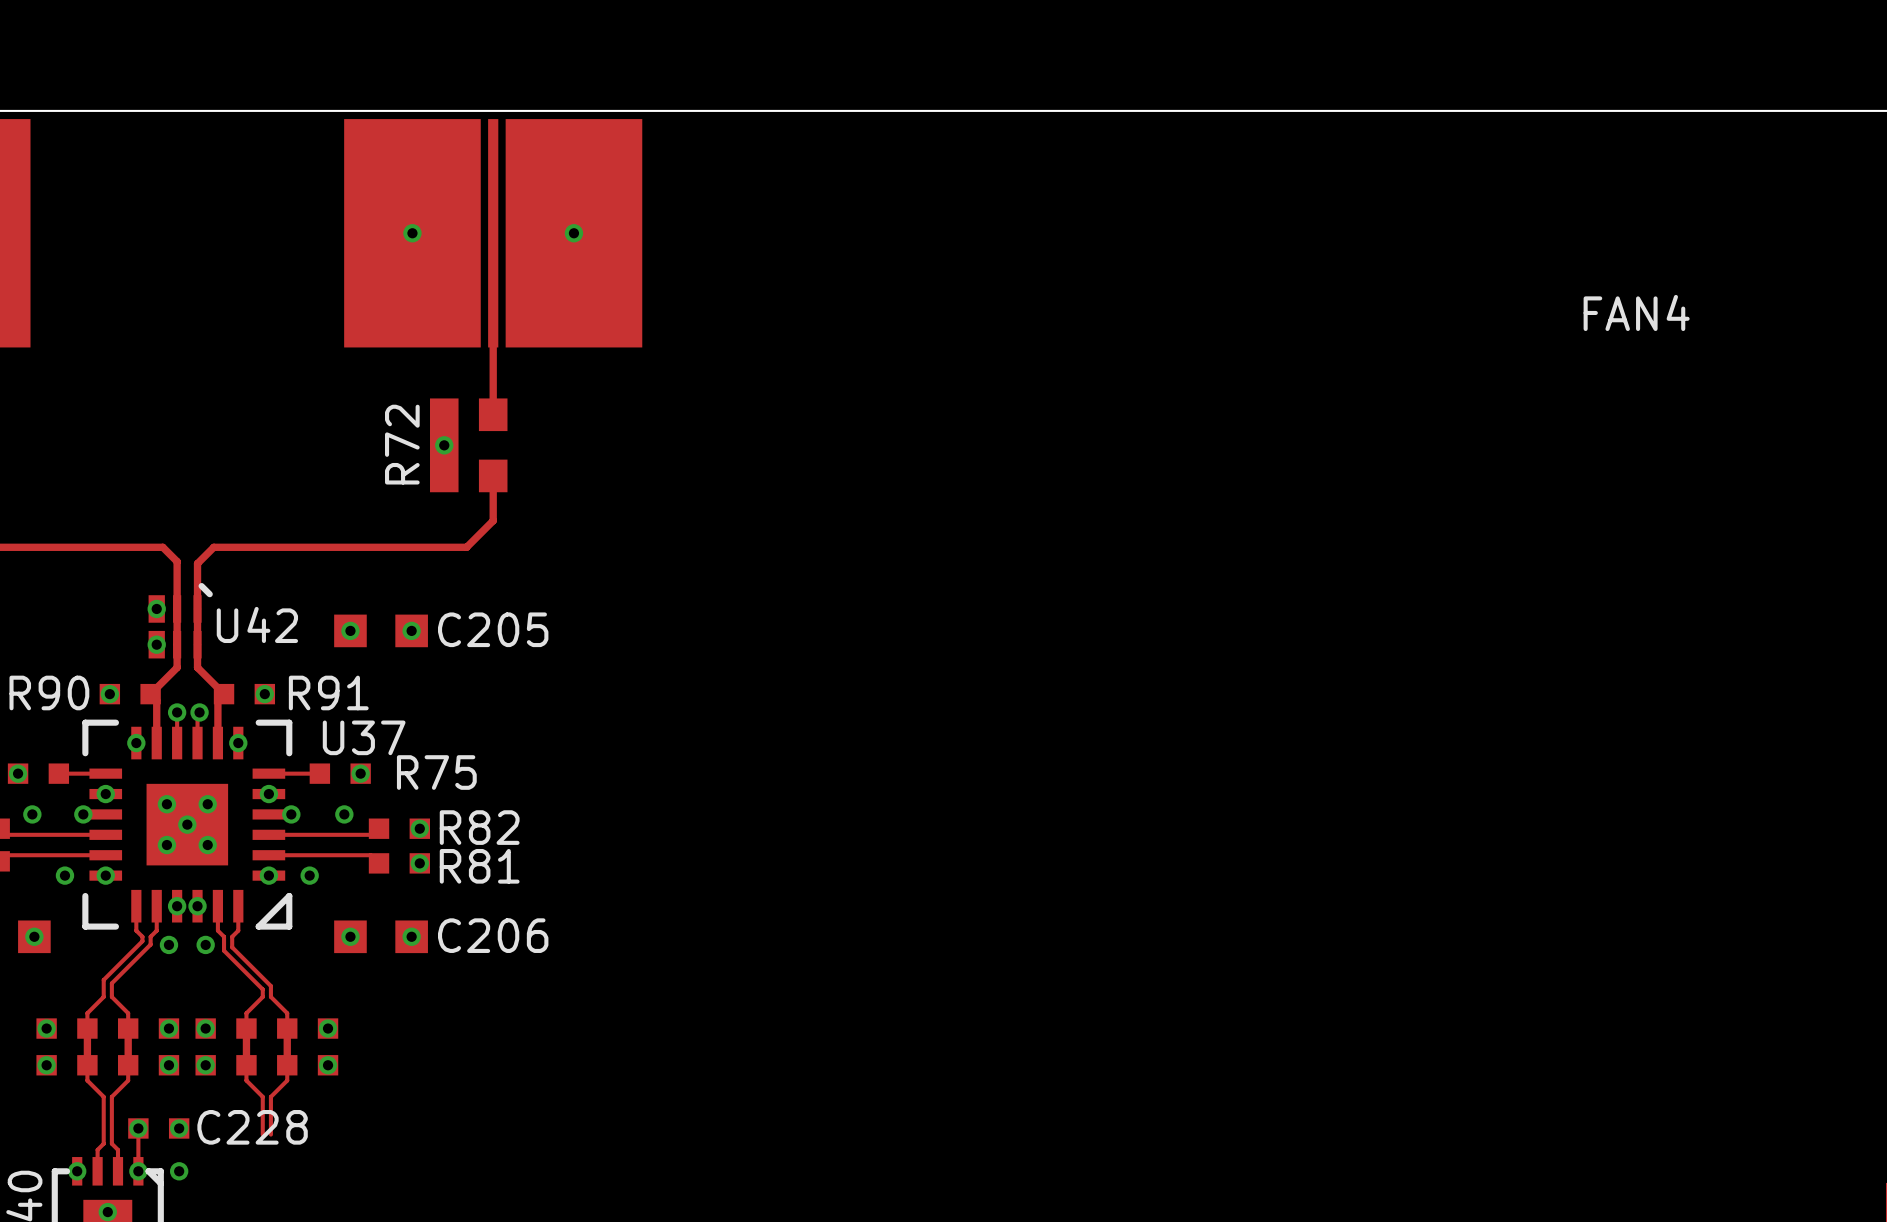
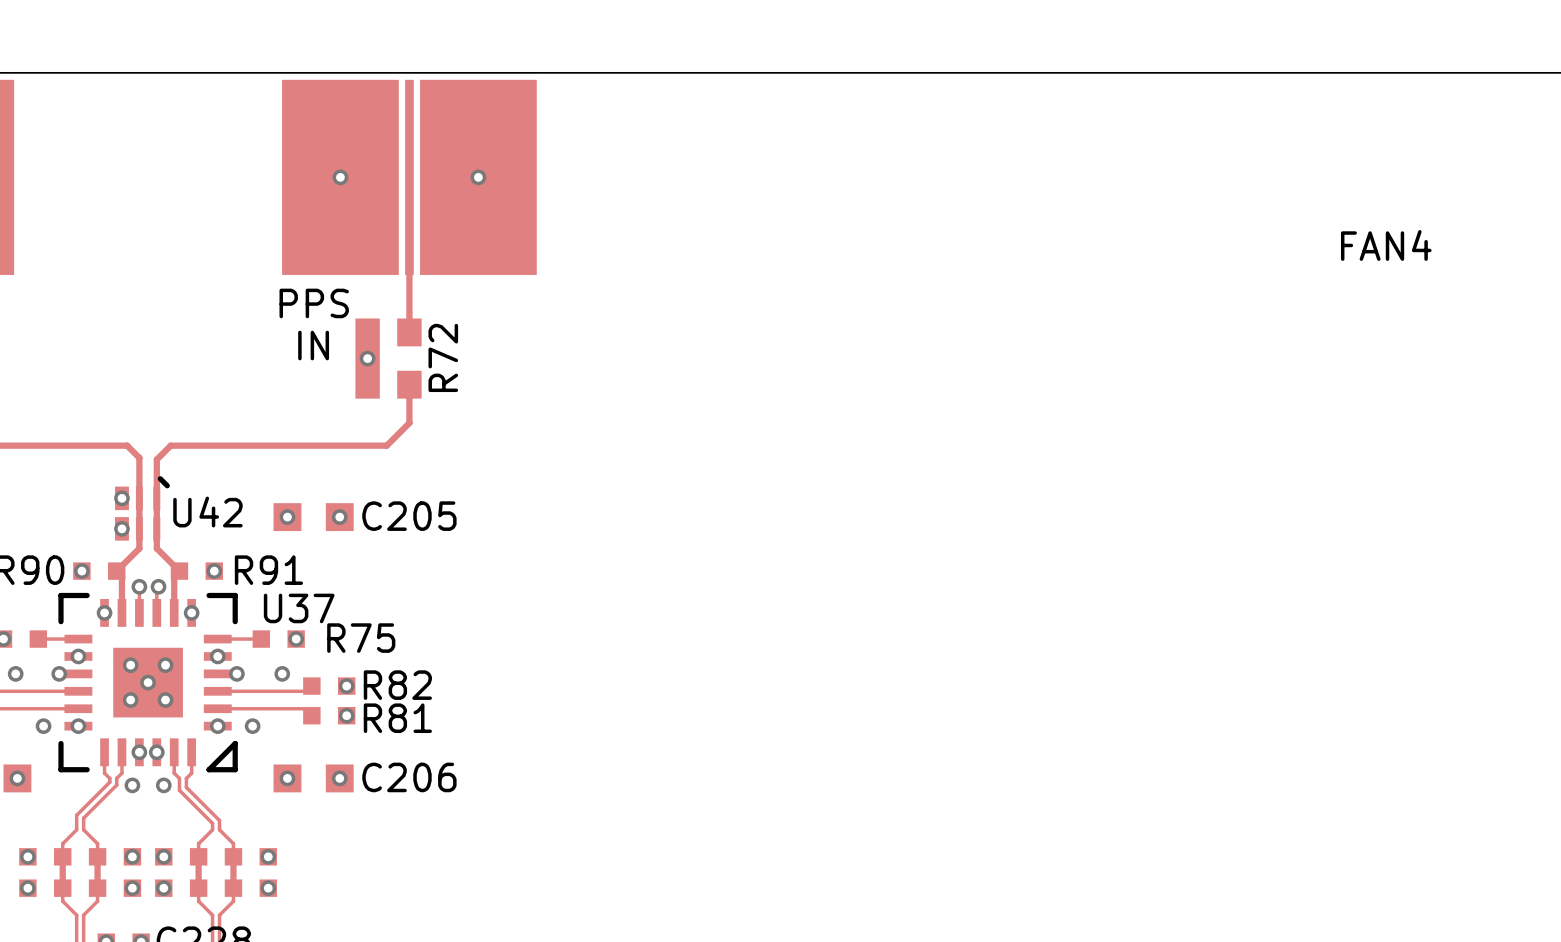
text: none -> PPS (314, 303)
text: none -> IN (313, 345)
R72 name position: R72 (402, 444) -> R72 (443, 357)

